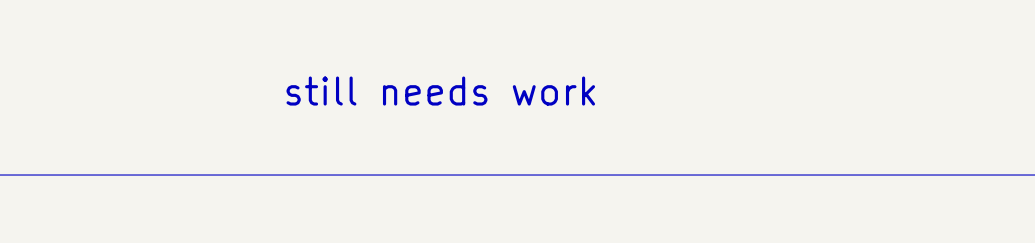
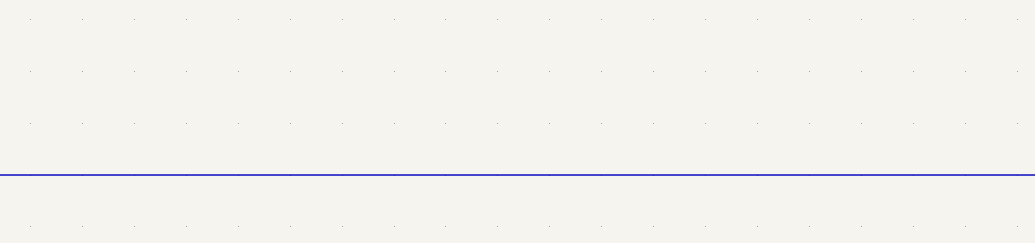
text: still needs work (440, 91) -> none

